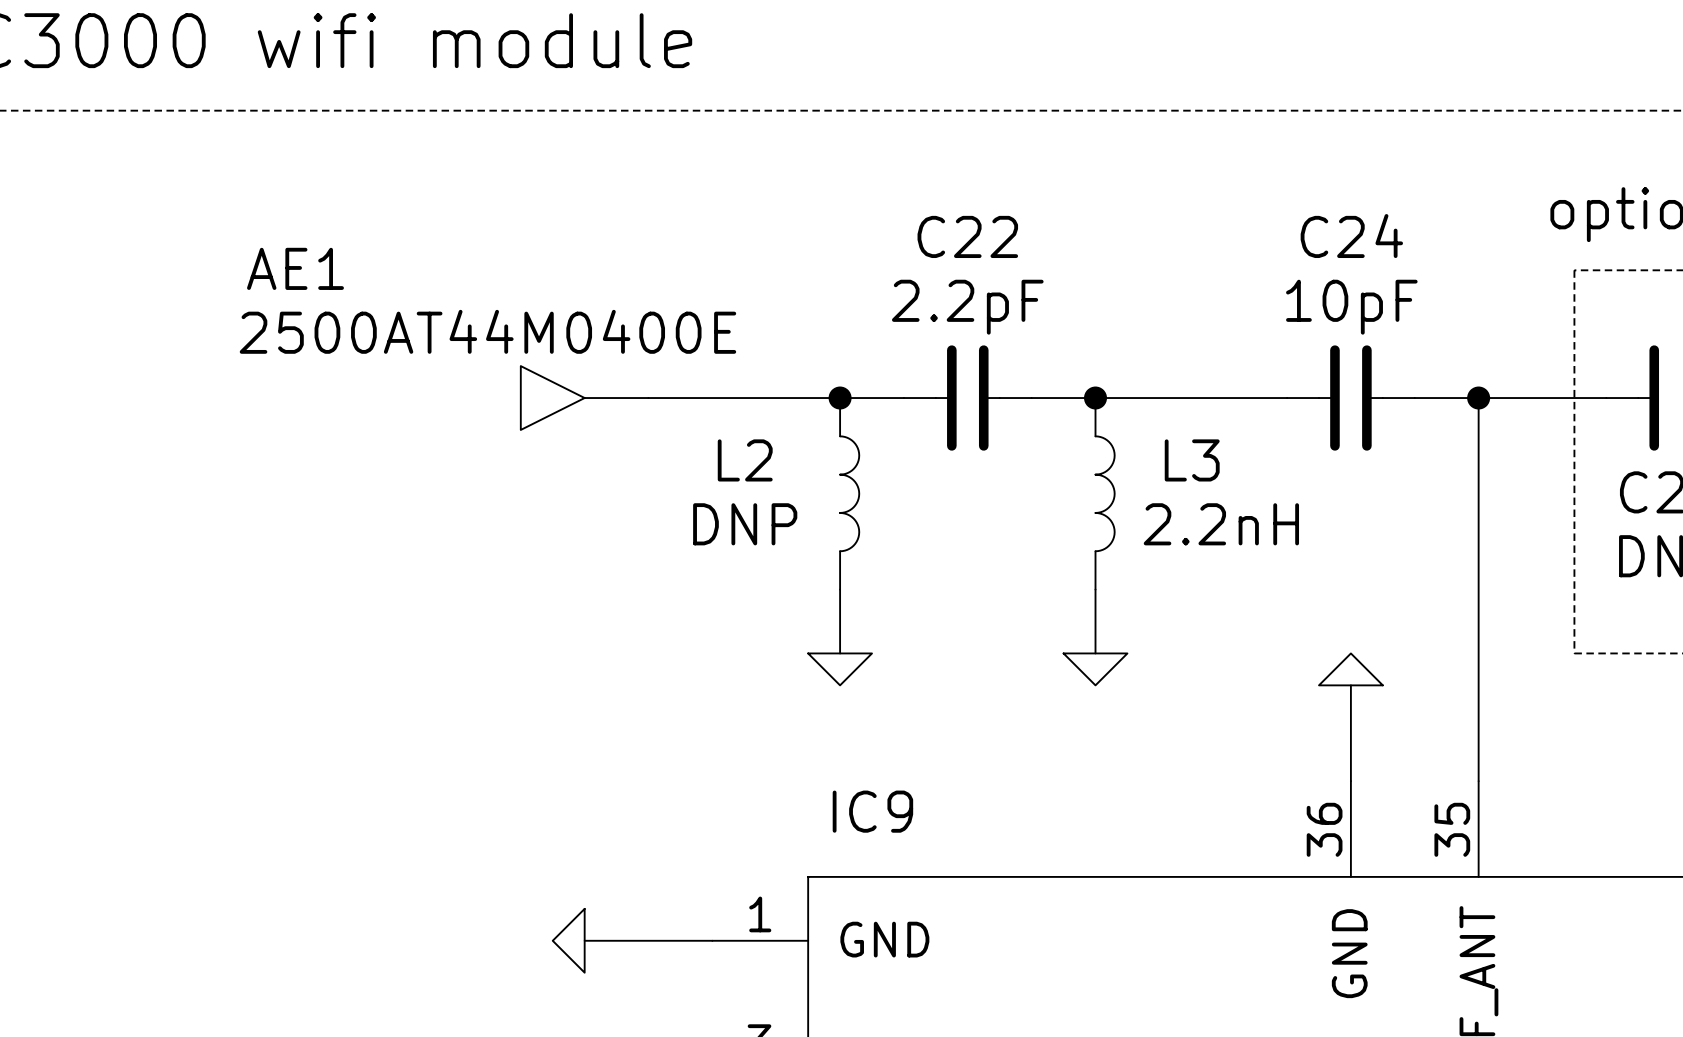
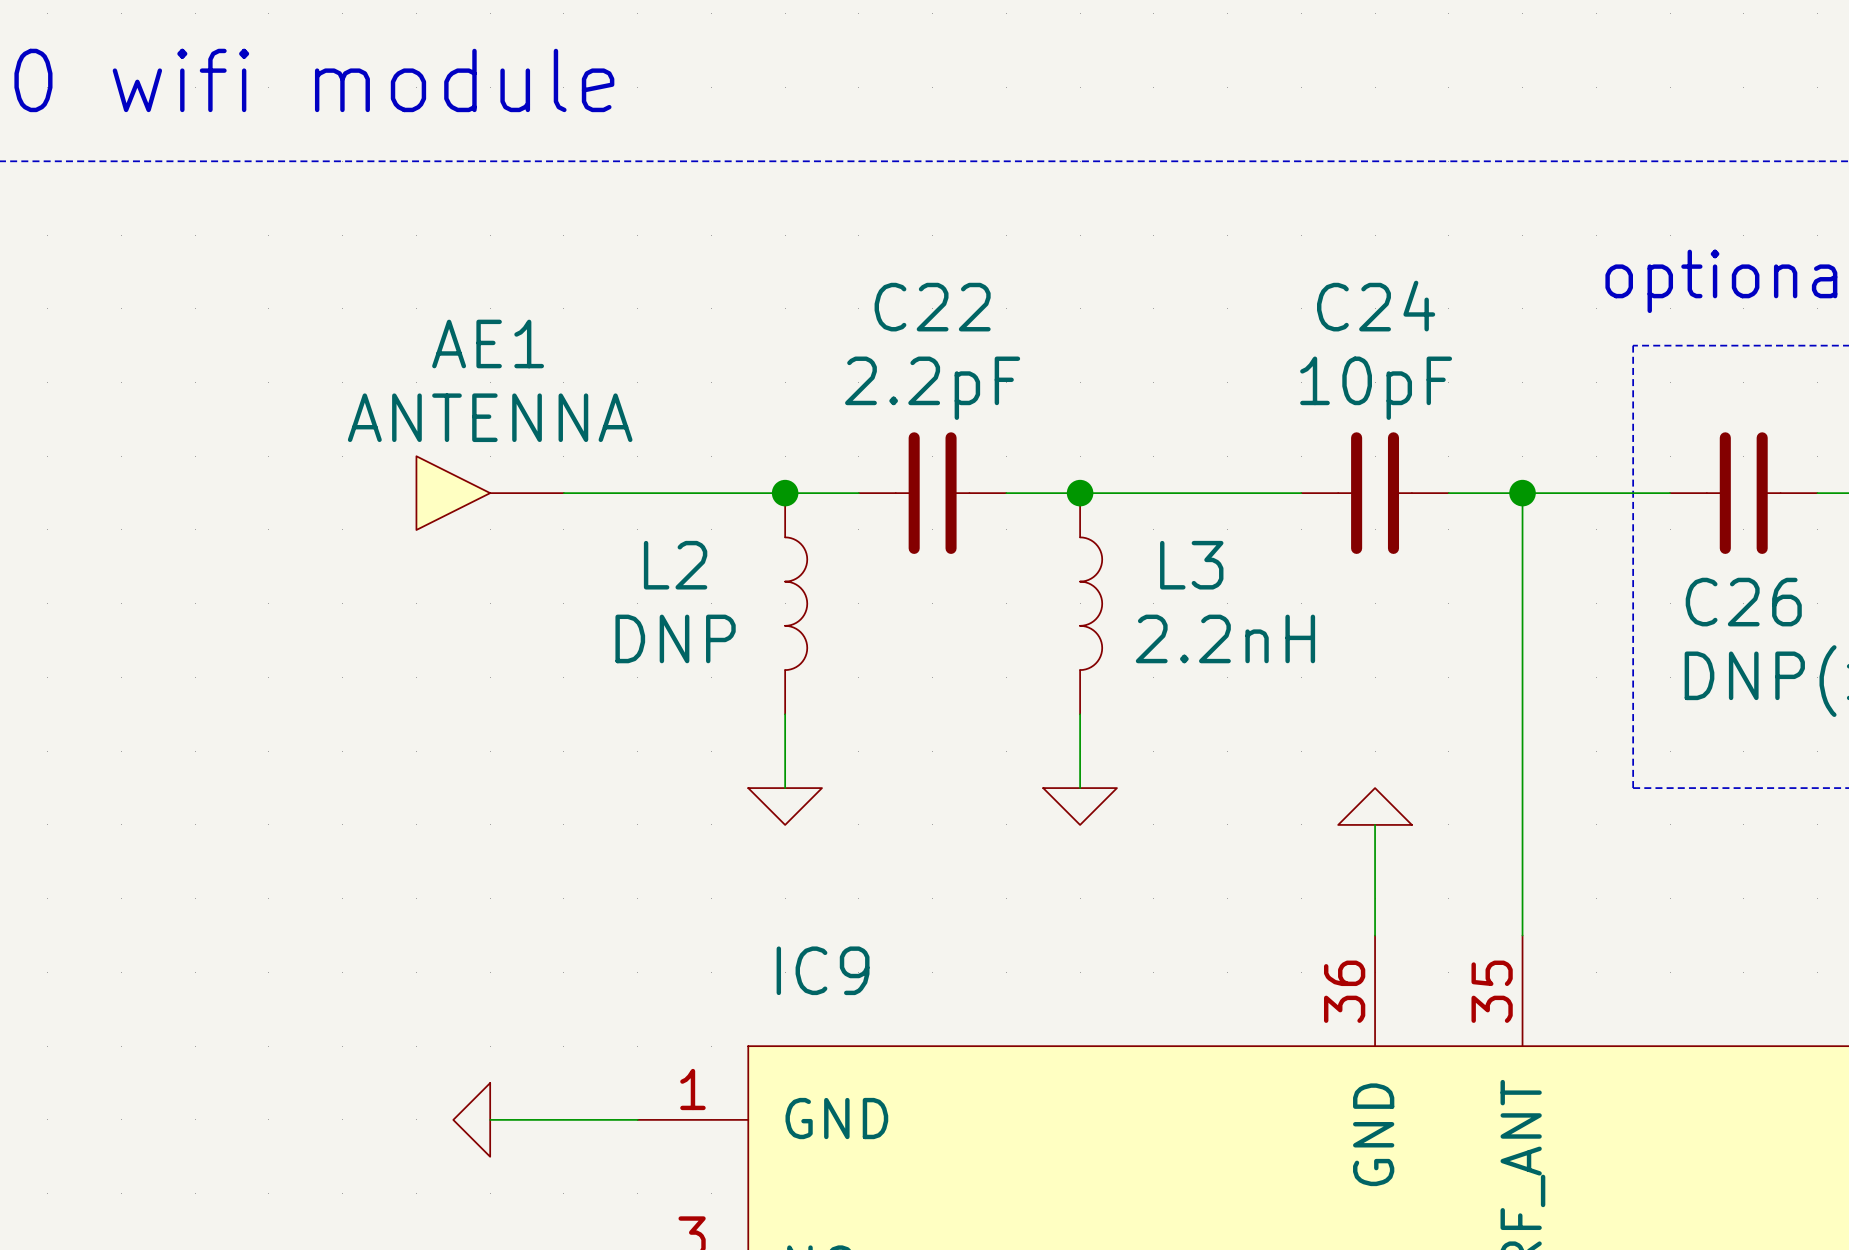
AE1 name position: AE1 (295, 268) -> AE1 (488, 343)
AE1 value: 2500AT44M0400E (487, 331) -> ANTENNA (490, 417)

